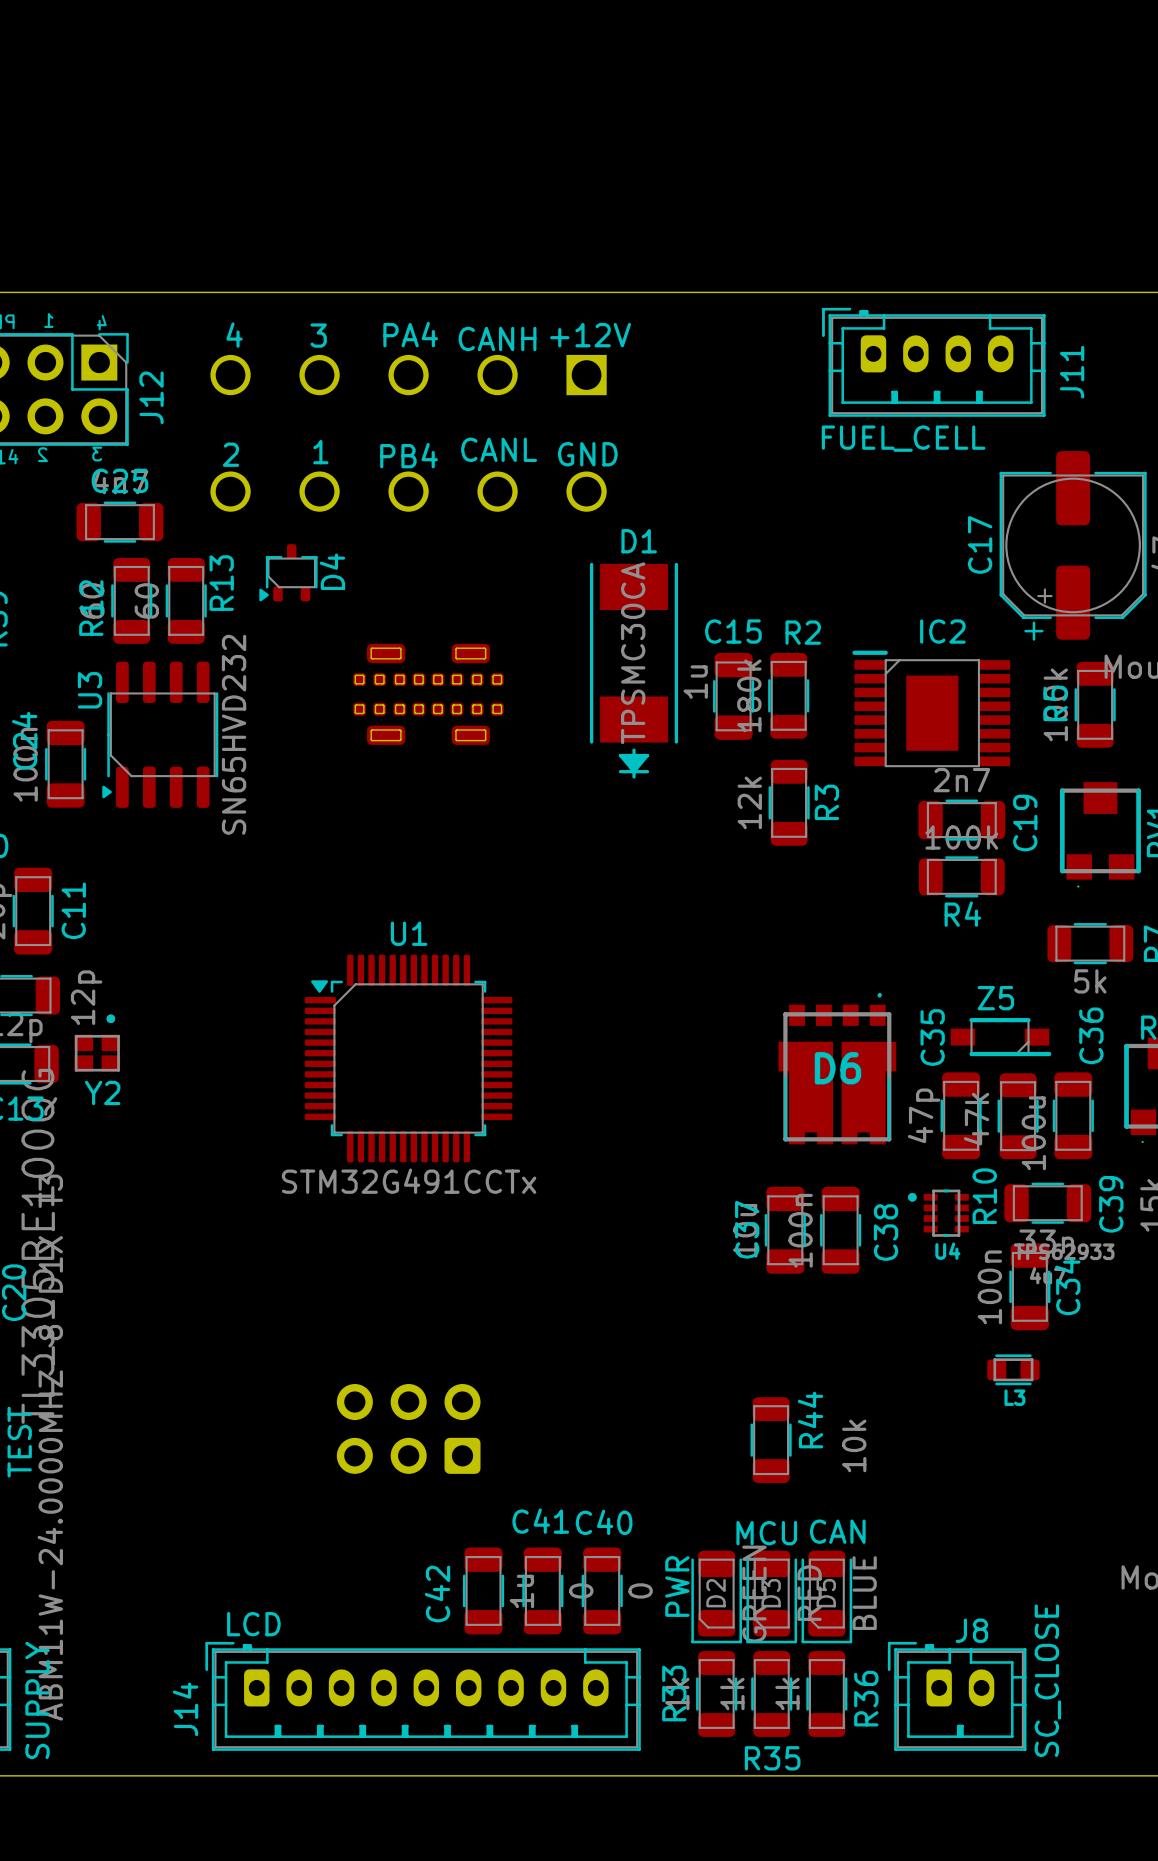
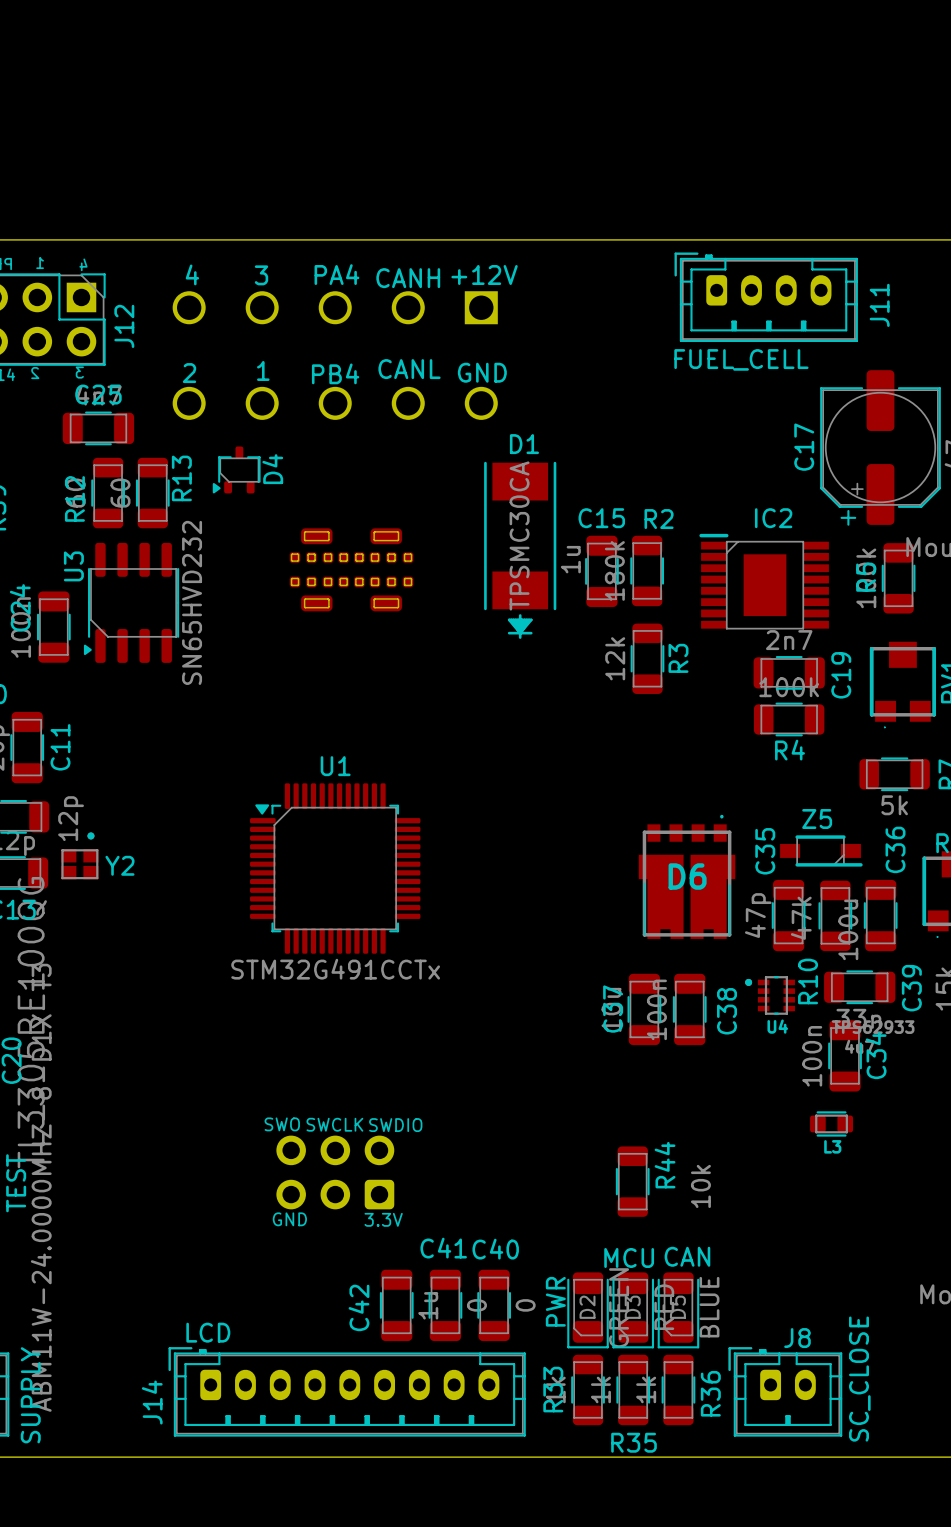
Y2 name position: Y2 (102, 1092) -> Y2 (119, 865)
text: none -> SWO (282, 1124)
text: none -> SWCLK (334, 1124)
text: none -> SWDIO (395, 1125)
text: none -> GND (289, 1219)
text: none -> 3.3V (383, 1219)

